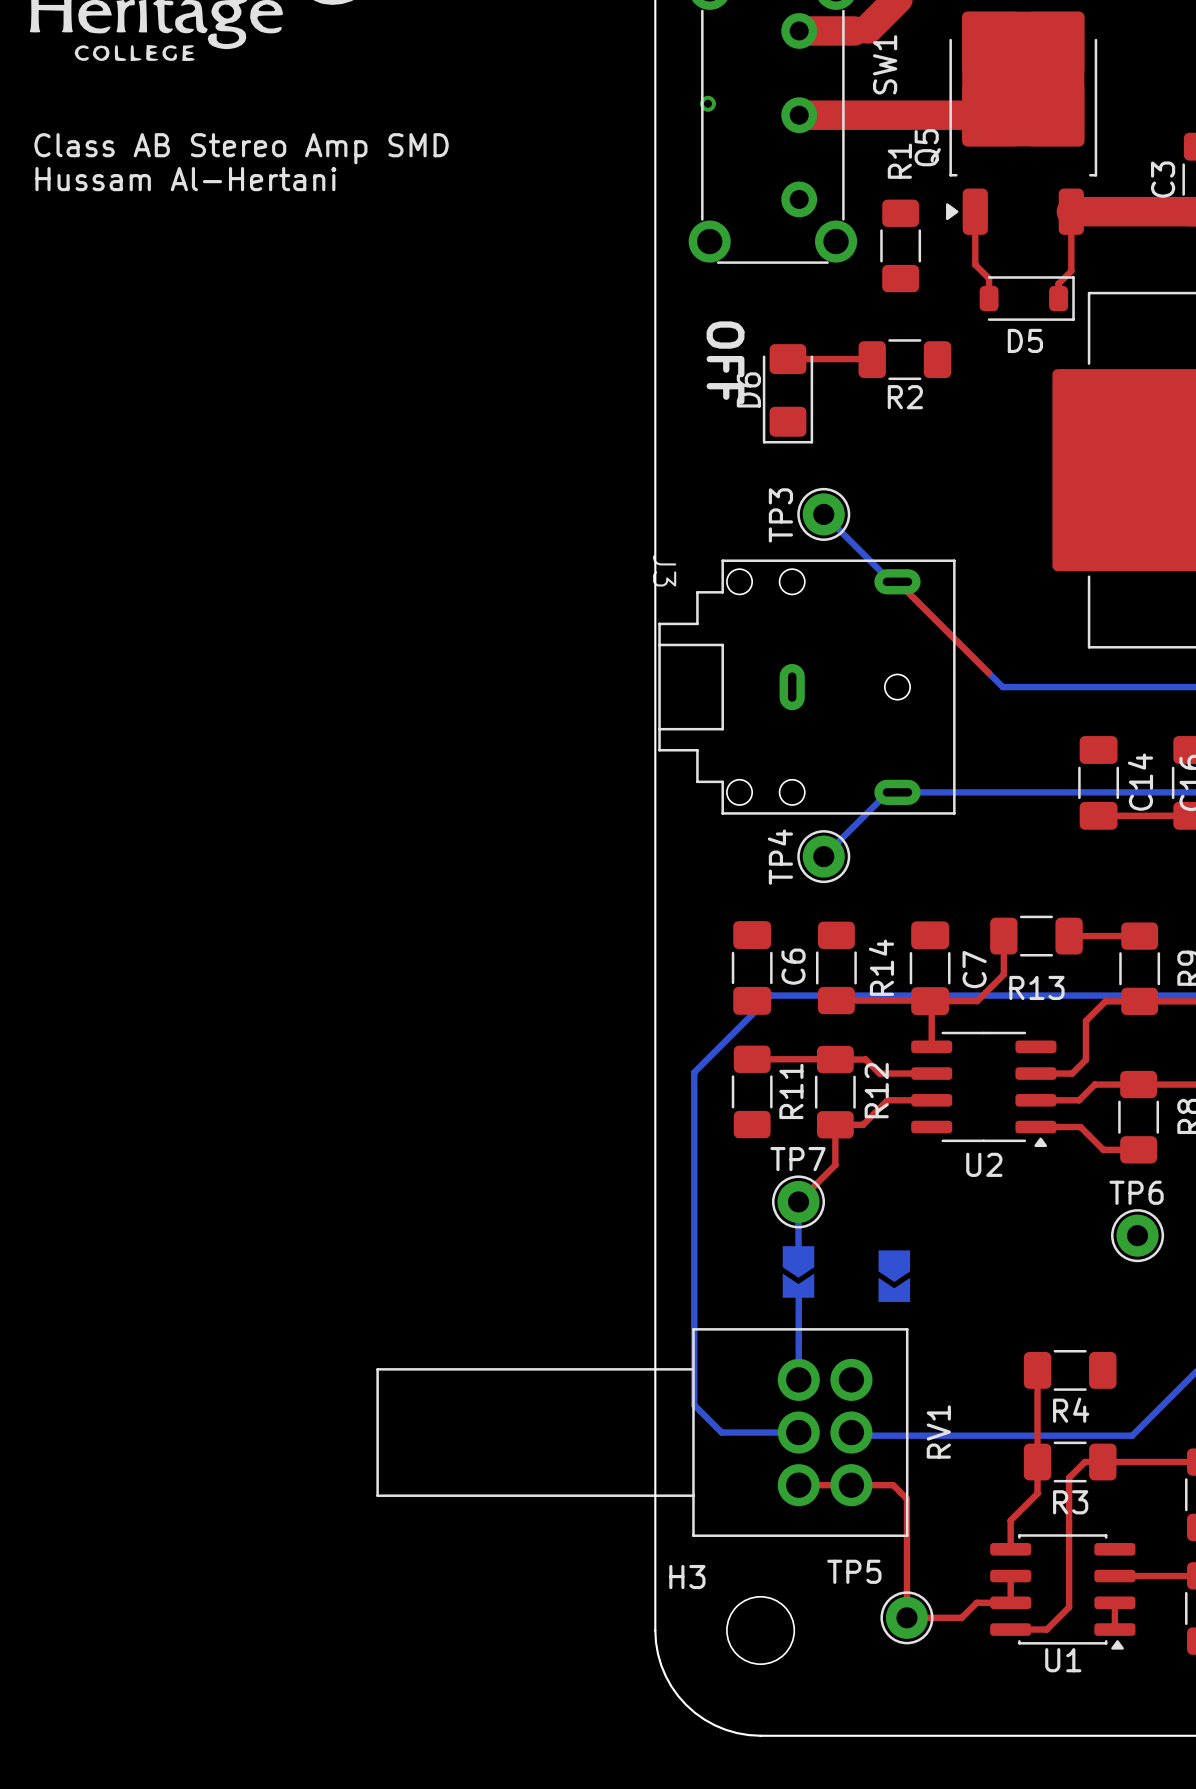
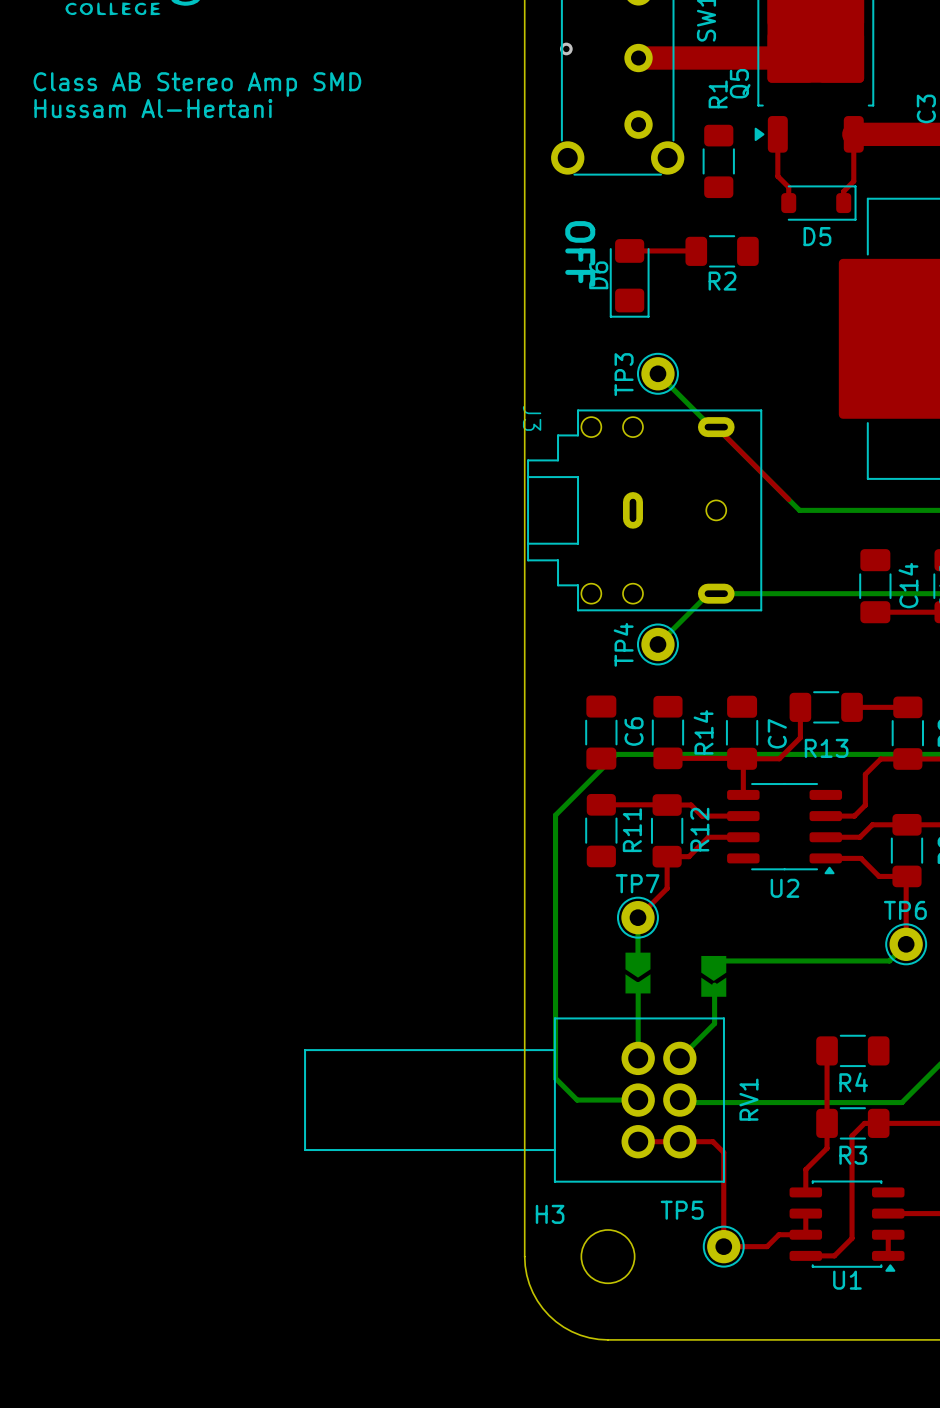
top track: none -> (907, 876) (906, 944)
bottom track: none -> (906, 944) (889, 960) (714, 960)
bottom track: none -> (714, 985) (714, 1023) (680, 1057)

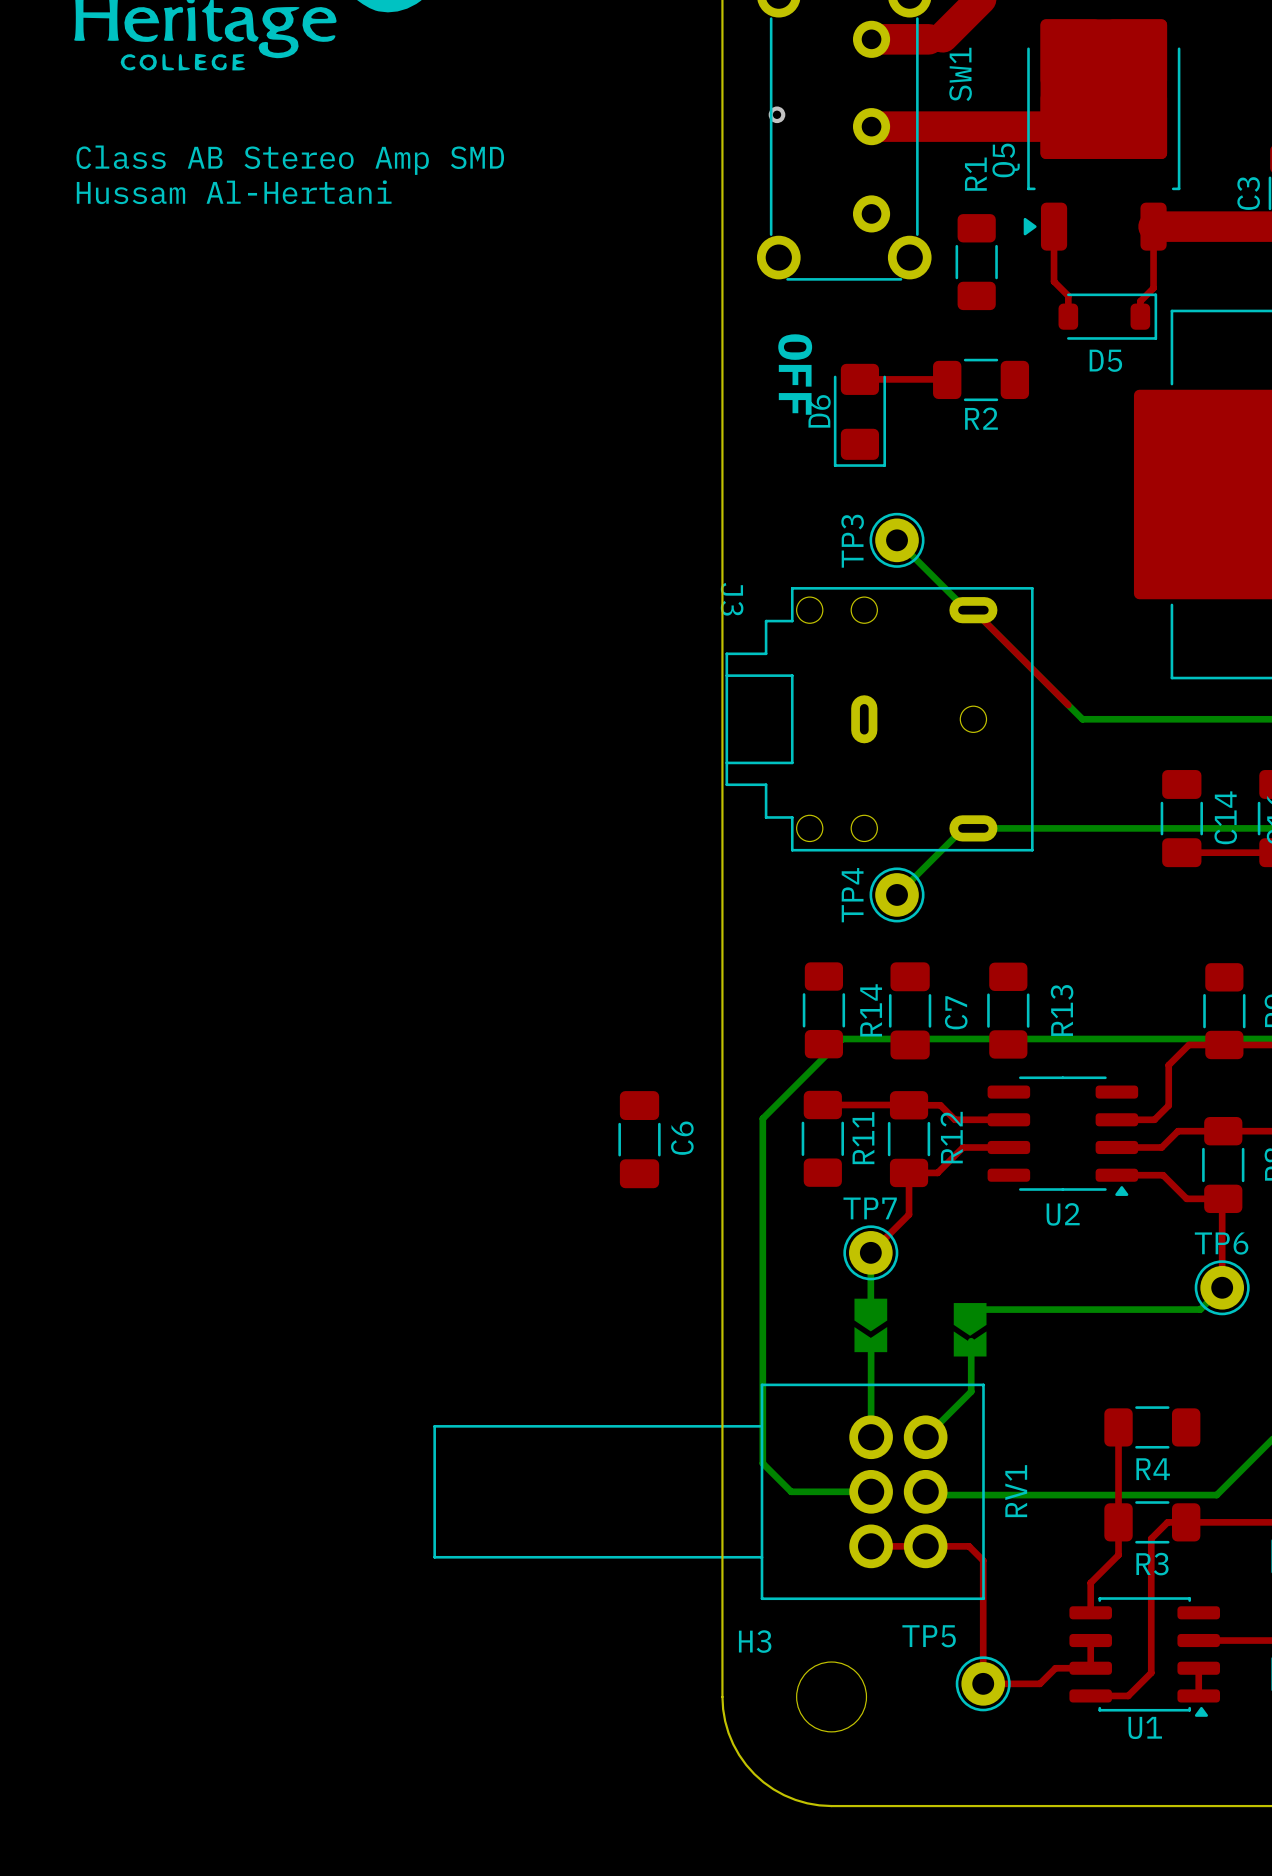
top track: (800, 707) (800, 737) (779, 758) (667, 758) -> none
R13 rotation: 0° (826, 707) -> 90° clockwise (1008, 1010)
R13 position: (826, 707) -> (1008, 1010)
top track: (852, 707) (907, 707) -> none
C6 position: (601, 732) -> (639, 1139)
R14 position: (667, 732) -> (823, 1010)
C7 position: (742, 732) -> (910, 1010)
R13 name position: R13 (826, 748) -> R13 (1062, 1010)
top track: (742, 758) (743, 794) -> none

